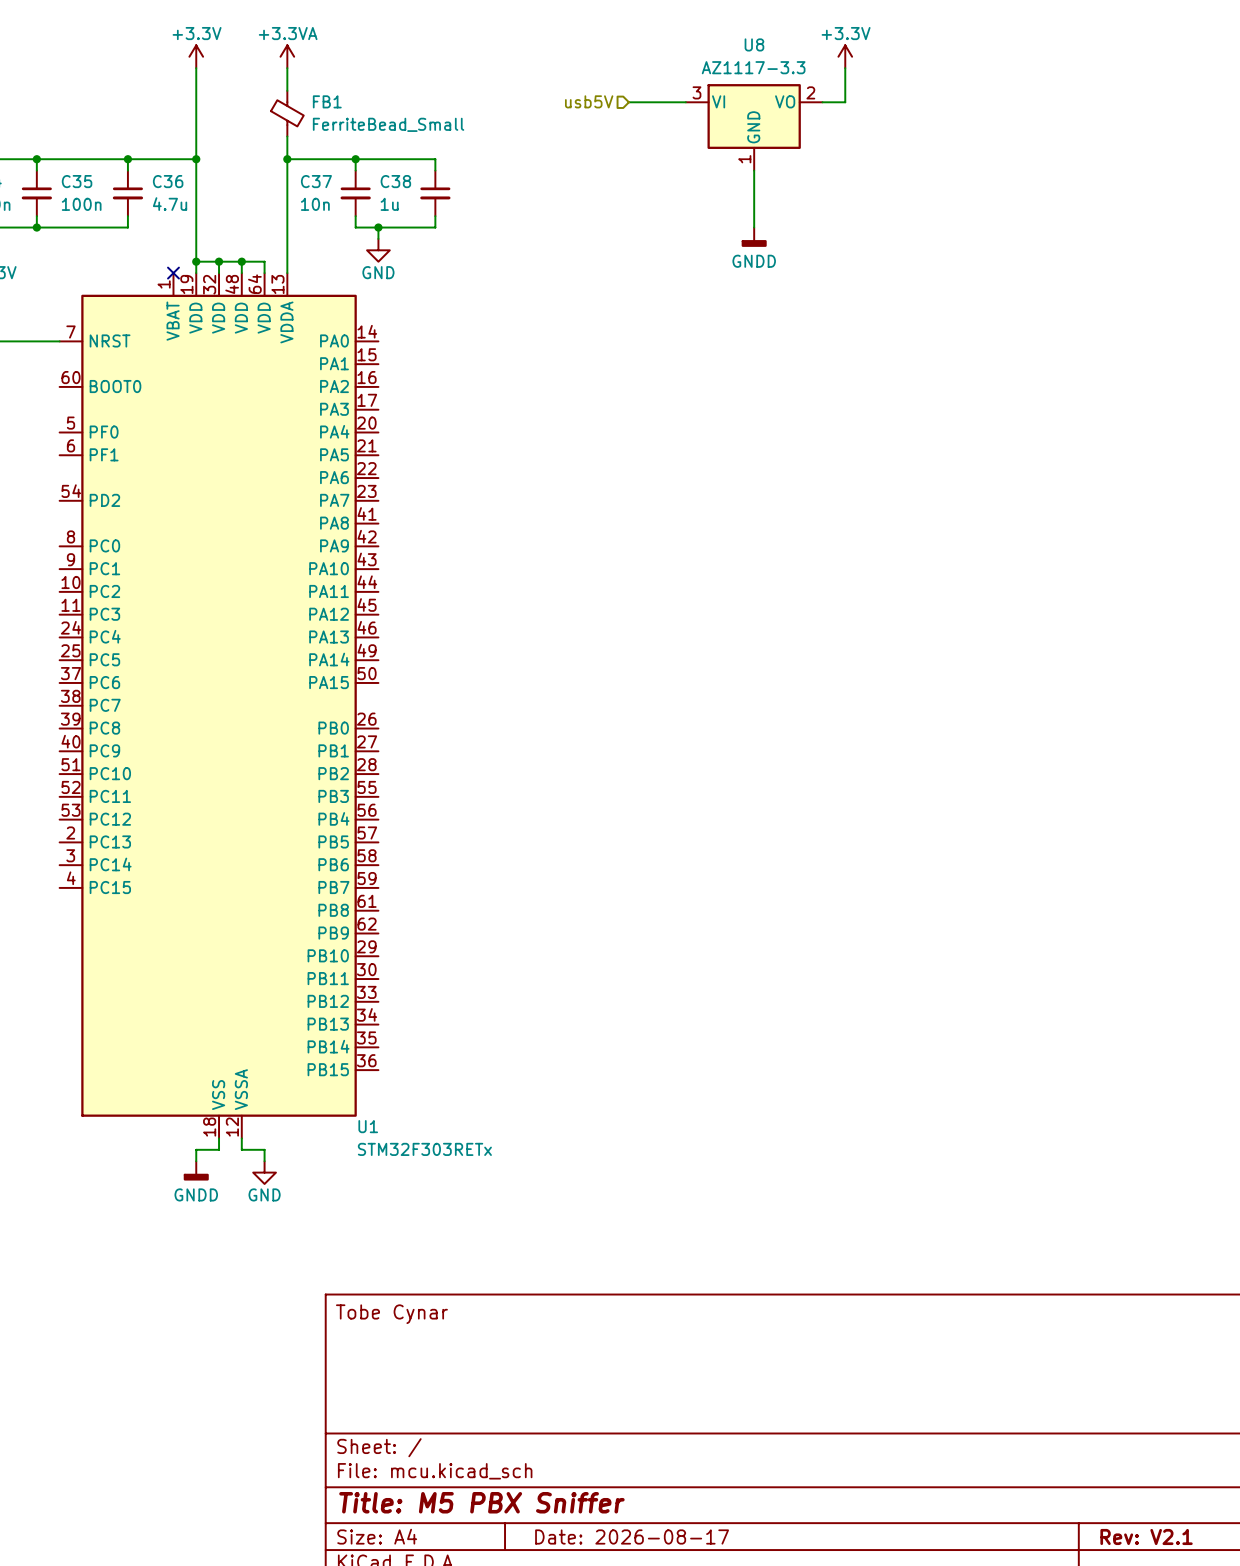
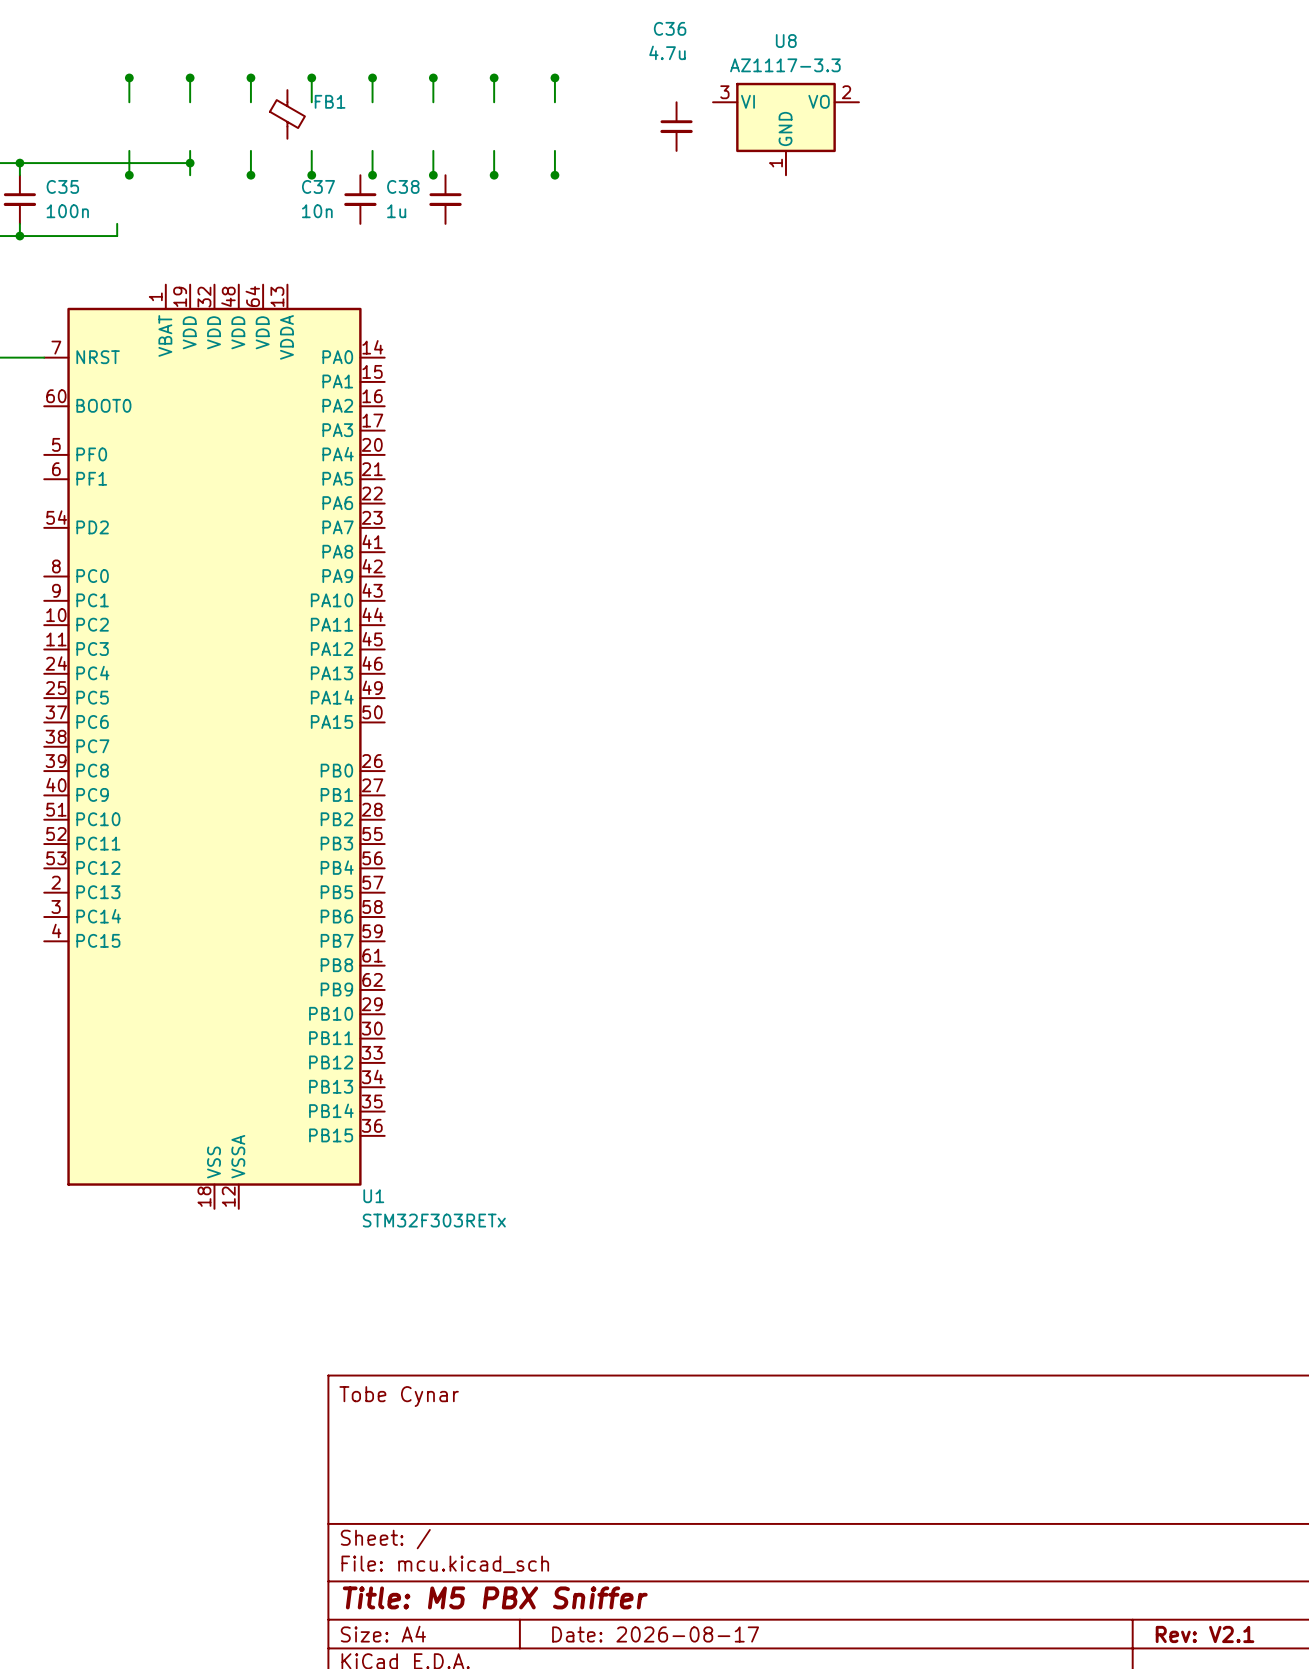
power symbol: +3.3V (196, 56) -> none
power symbol: +3.3VA (287, 56) -> none
power symbol: +3.3V (845, 56) -> none
wire: (196, 68) (196, 79) -> none
wire: (287, 68) (287, 90) -> (372, 77) (372, 102)
wire: (845, 68) (845, 102) (822, 102) -> none
wire: none -> (129, 77) (129, 102)
junction: none -> (129, 77)
junction: none -> (190, 77)
wire: none -> (250, 77) (250, 102)
junction: none -> (250, 77)
wire: none -> (311, 77) (311, 102)
junction: none -> (311, 77)
junction: none -> (372, 77)
wire: none -> (433, 77) (433, 102)
junction: none -> (433, 77)
wire: none -> (494, 77) (494, 102)
junction: none -> (494, 77)
wire: none -> (554, 77) (554, 102)
junction: none -> (554, 77)
hierarchical label: usb5V (589, 101) -> none
wire: (196, 102) (196, 147) -> none
wire: (628, 102) (685, 102) -> none
FB1 value: FerriteBead_Small (388, 124) -> none
wire: (287, 136) (287, 273) -> none
wire: none -> (129, 150) (129, 175)
wire: none -> (250, 150) (250, 175)
wire: none -> (311, 150) (311, 175)
wire: none -> (372, 150) (372, 175)
wire: none -> (433, 150) (433, 175)
wire: none -> (494, 150) (494, 175)
wire: none -> (554, 150) (554, 175)
wire: (127, 159) (127, 170) -> none
junction position: (127, 159) -> (129, 175)
wire: (287, 159) (435, 159) (435, 170) -> none
junction: (287, 159) -> none
wire: (355, 159) (355, 170) -> none
junction position: (355, 159) -> (372, 175)
wire: (196, 170) (196, 273) -> none
junction: none -> (250, 175)
junction: none -> (311, 175)
junction: none -> (433, 175)
junction: none -> (494, 175)
junction: none -> (554, 175)
wire: (754, 170) (754, 227) -> none
C36 name position: C36 (168, 181) -> C36 (670, 28)
C36 position: (127, 193) -> (676, 126)
C36 value position: 4.7u (170, 204) -> 4.7u (667, 52)
wire: (355, 216) (355, 227) (435, 227) (435, 216) -> none
wire: (378, 227) (378, 238) -> none
junction: (378, 227) -> none
power symbol: GNDD (754, 237) -> none
power symbol: GND (378, 250) -> none
wire: (196, 261) (264, 261) (264, 273) -> none
junction: (196, 261) -> none
wire: (219, 261) (219, 273) -> none
junction: (219, 261) -> none
wire: (241, 261) (241, 273) -> none
junction: (241, 261) -> none
no-connect mark: (173, 273) -> none
wire: (219, 1138) (219, 1149) (196, 1149) (196, 1161) -> none
wire: (241, 1138) (241, 1149) (264, 1149) (264, 1161) -> none
power symbol: GNDD (196, 1170) -> none
power symbol: GND (264, 1172) -> none

